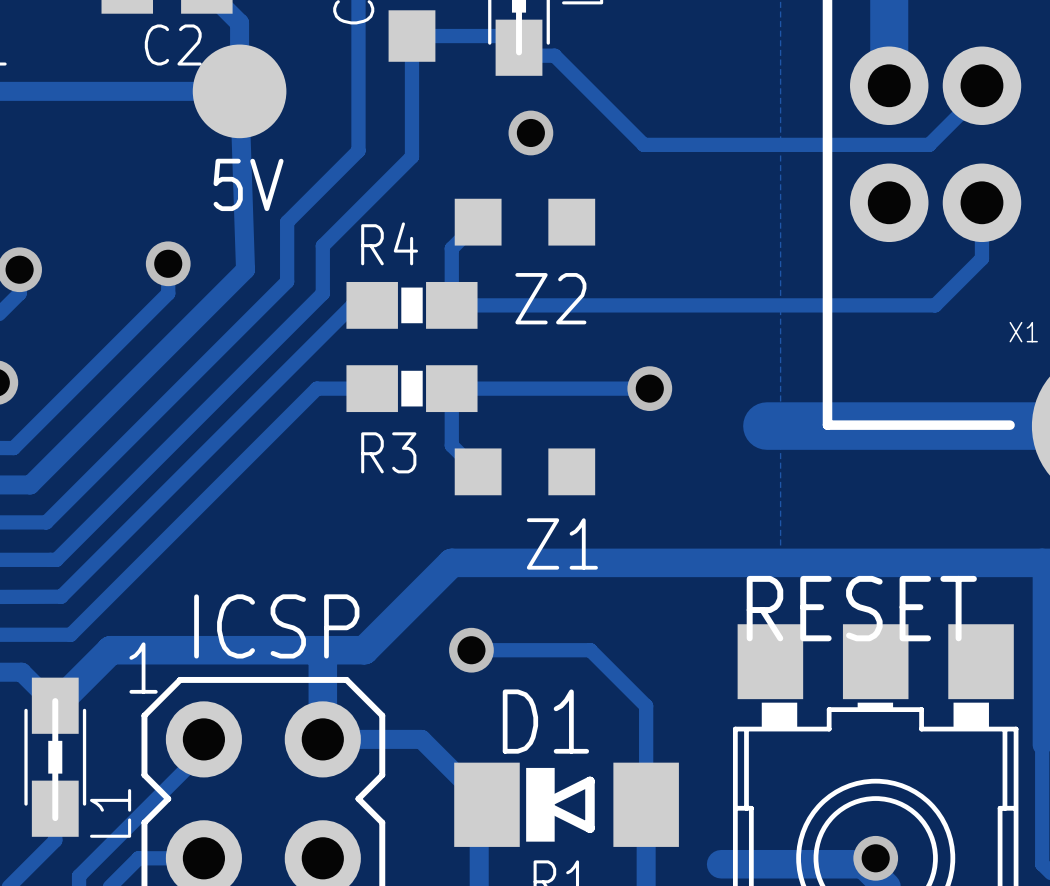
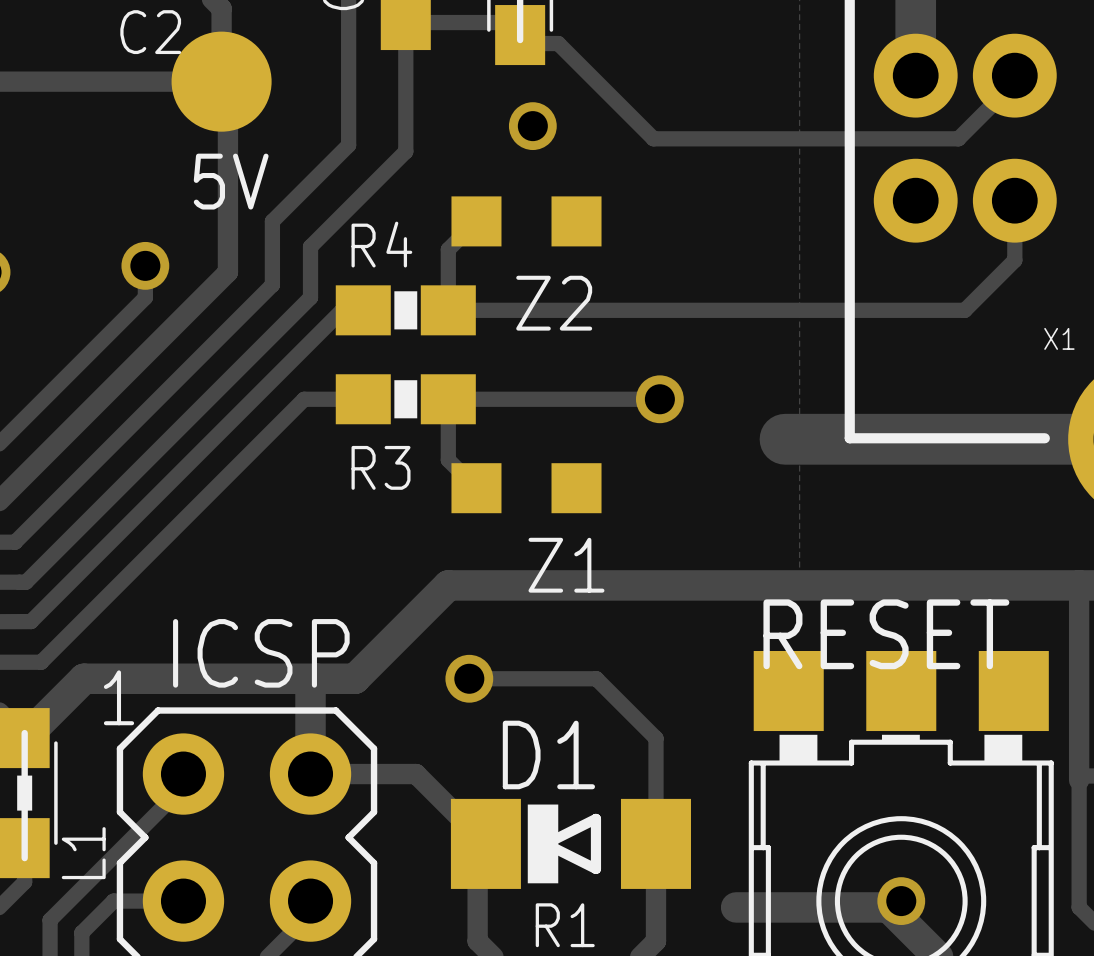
track: (239, 61) (245, 269) -> (221, 49) (189, 81) (221, 81) (227, 88) (227, 272)

